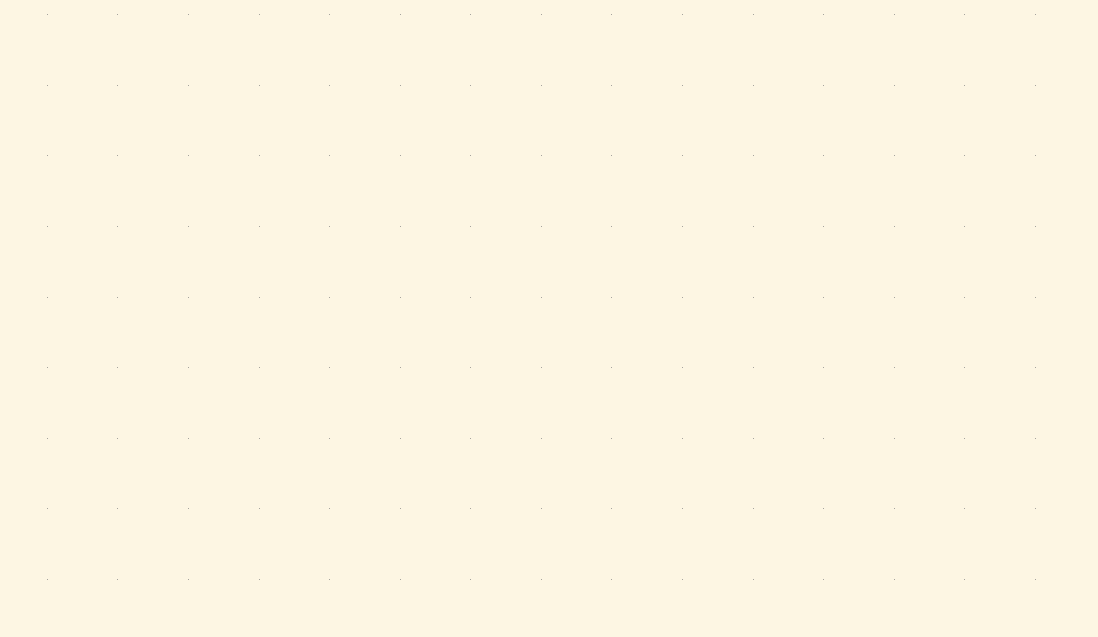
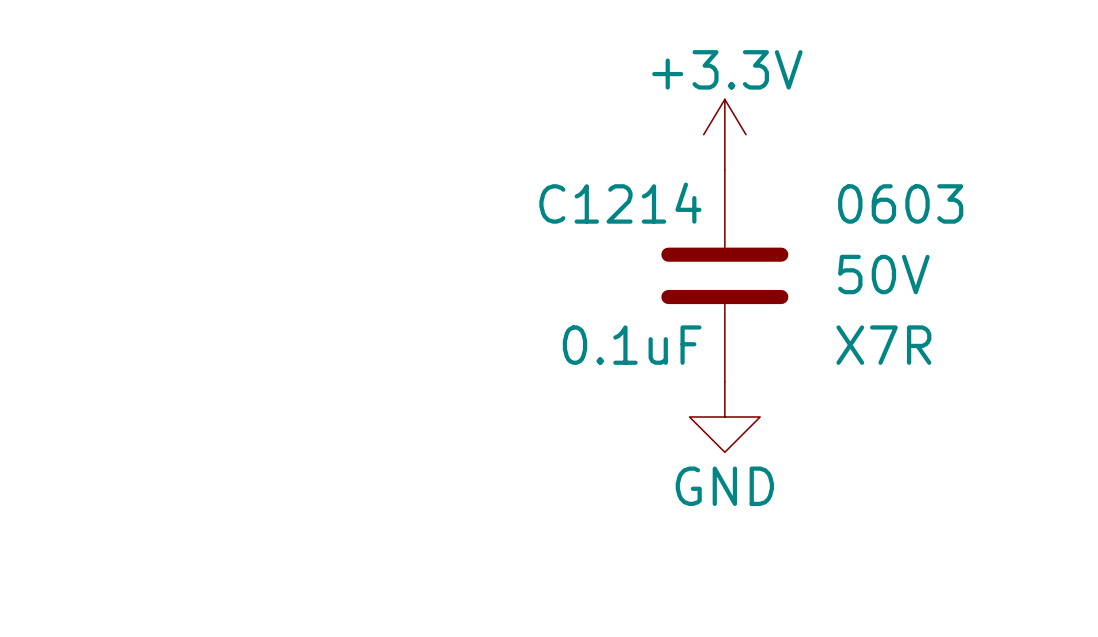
power symbol: none -> +3.3V (724, 134)
C1214: none -> 0.1uF (724, 275)
power symbol: none -> GND (724, 416)

